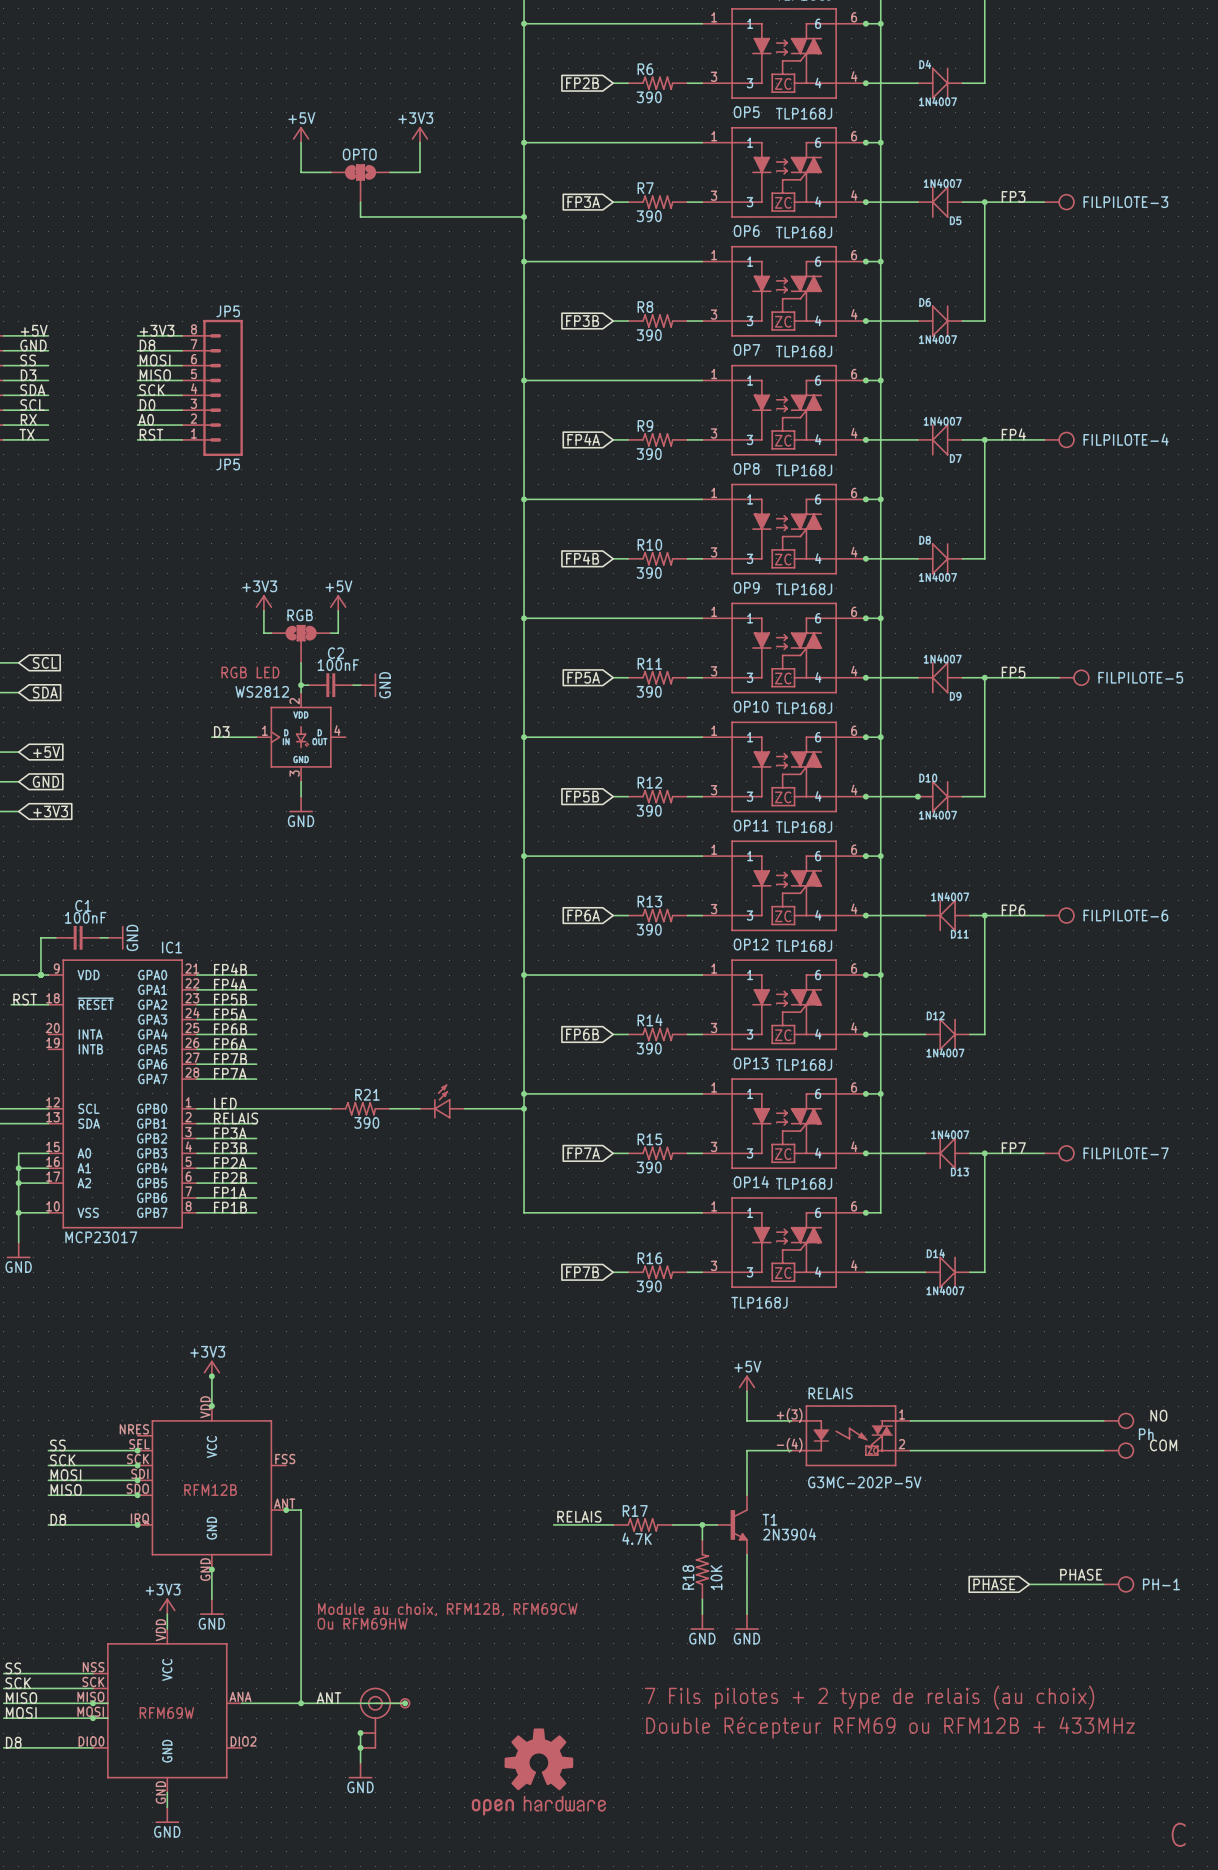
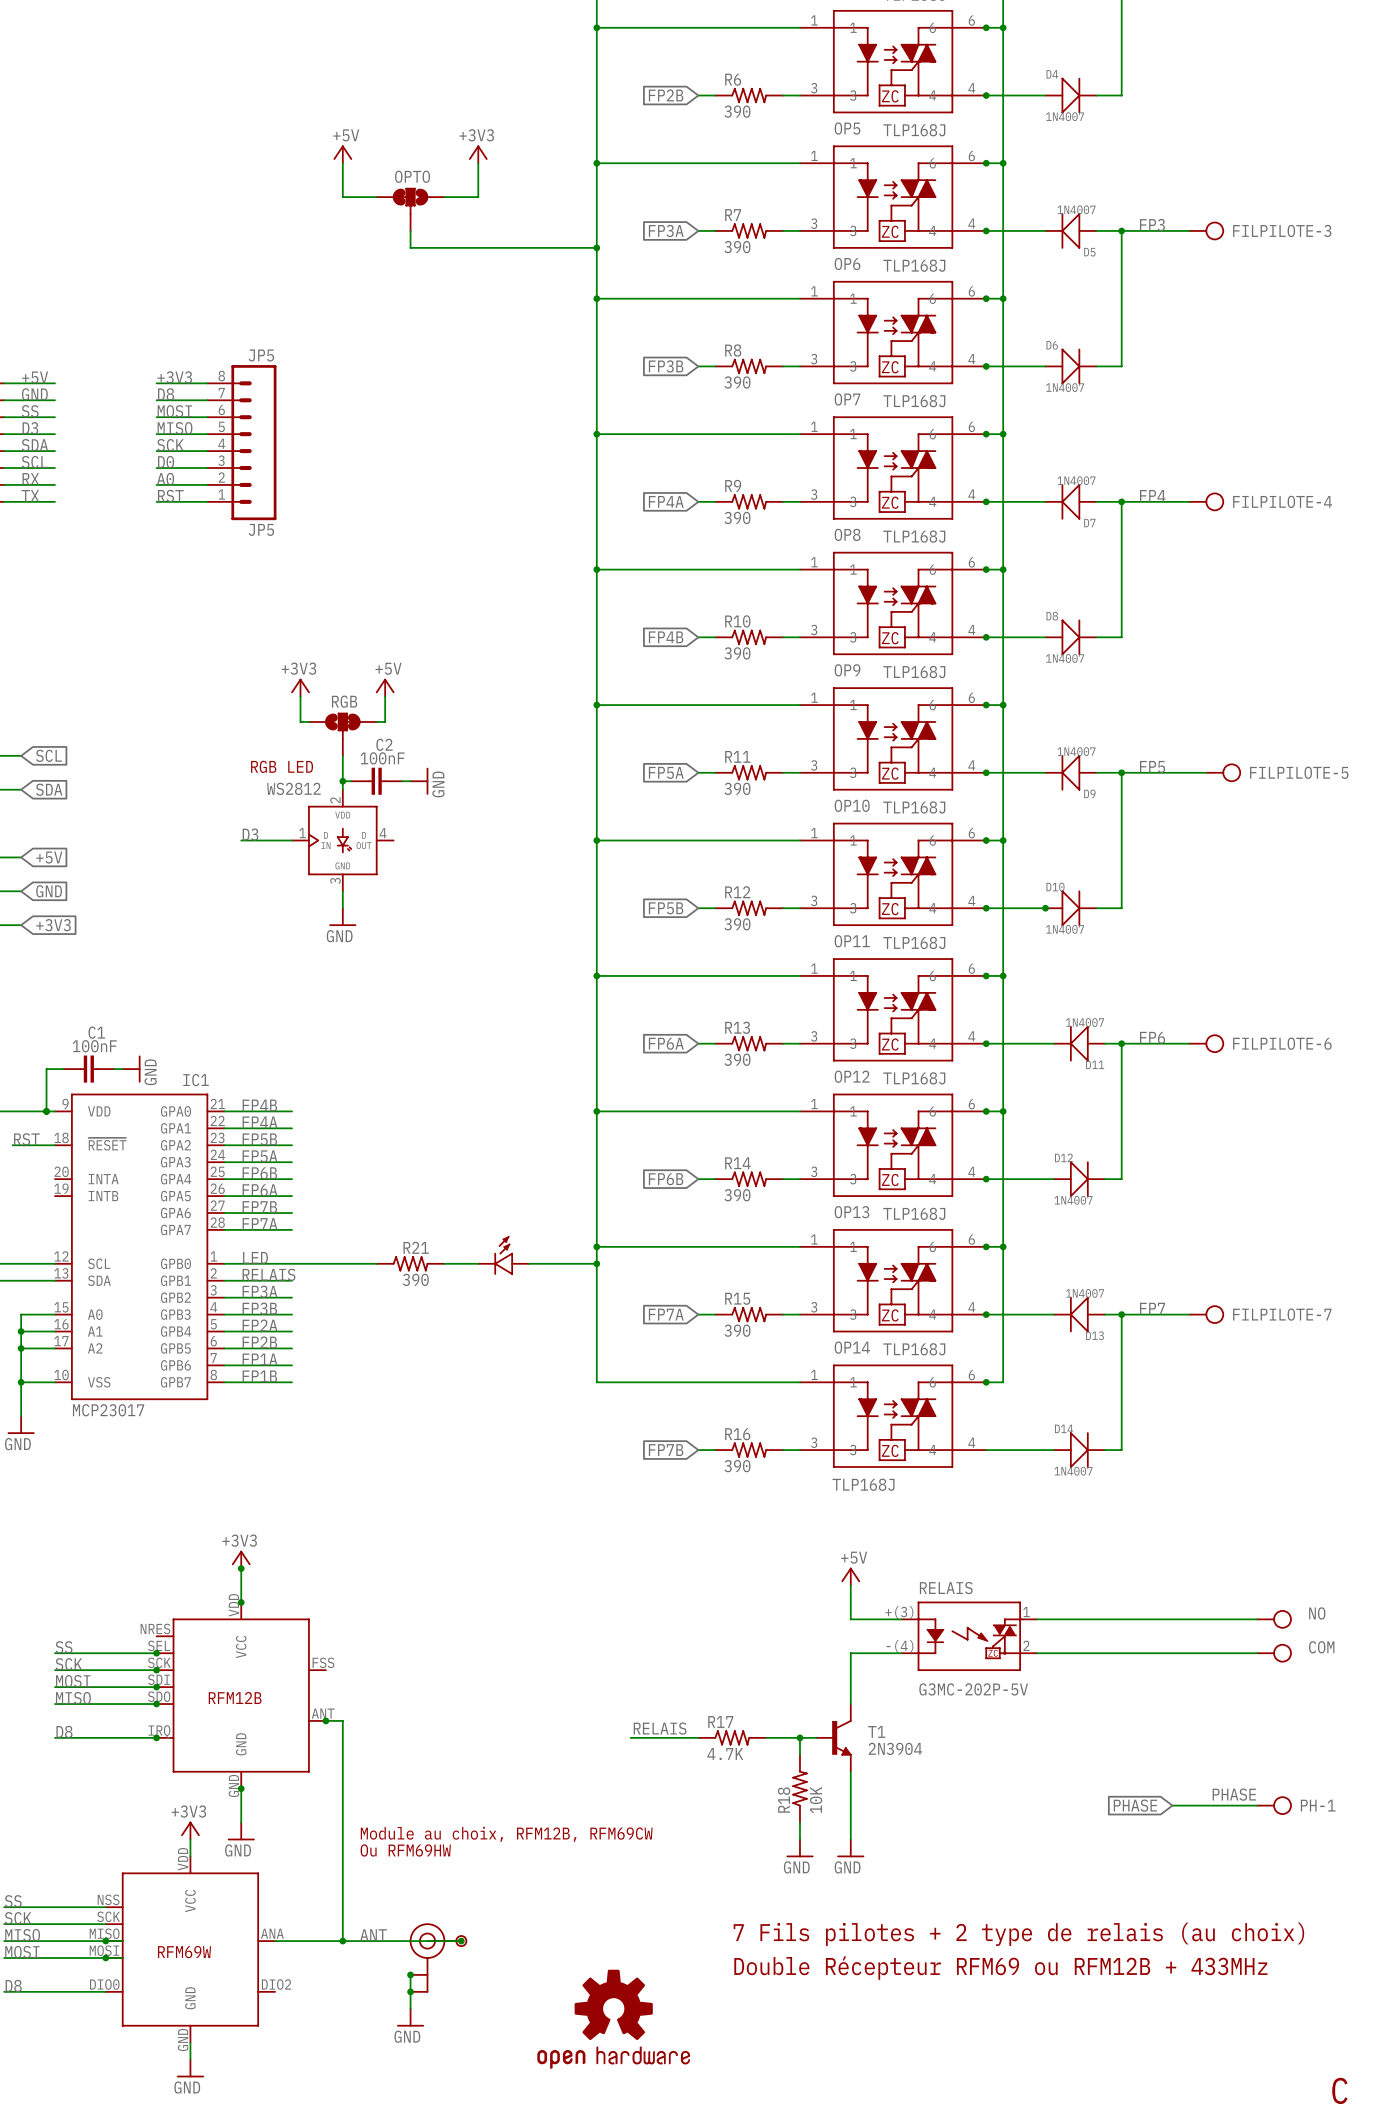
part value: Ph (1146, 1434) -> none

